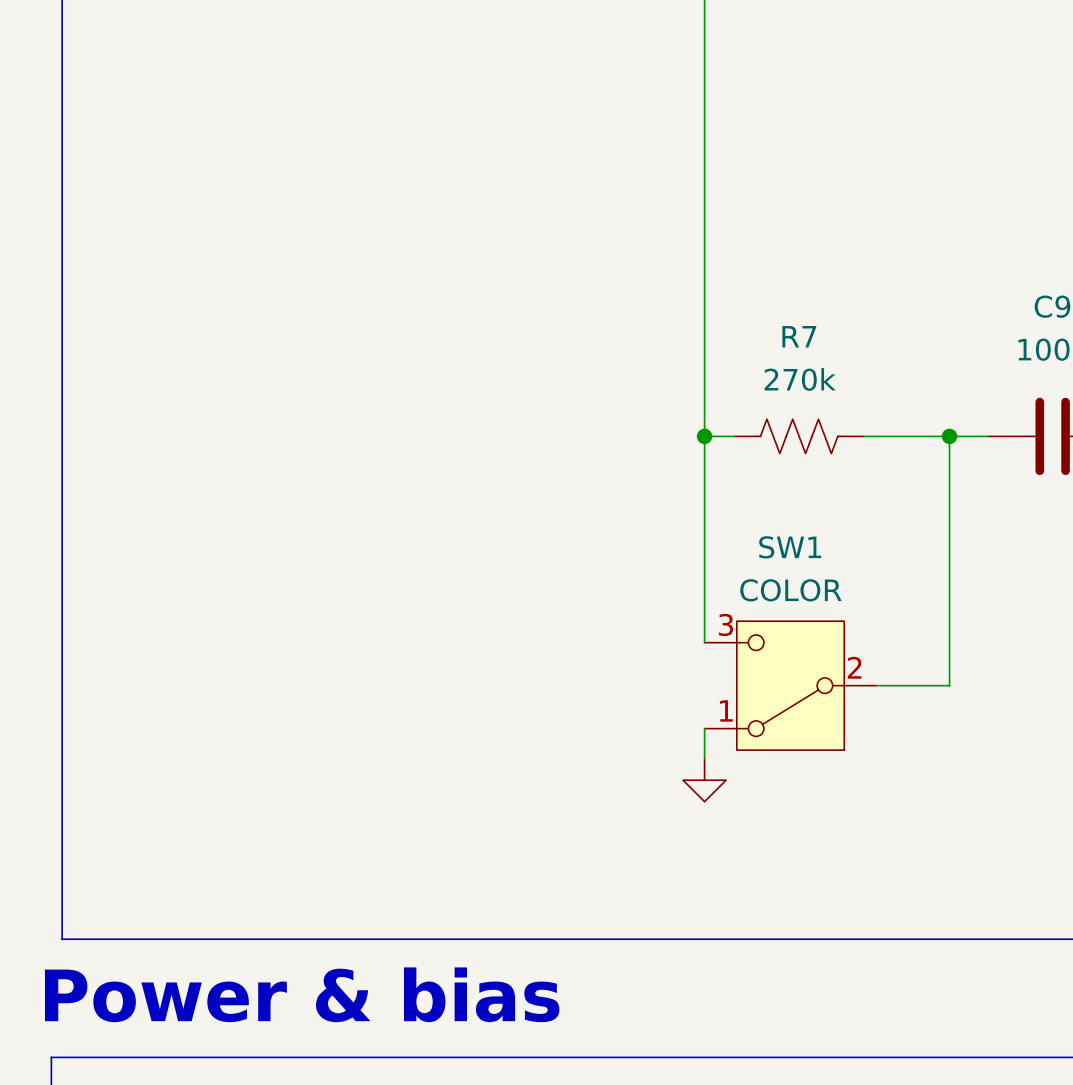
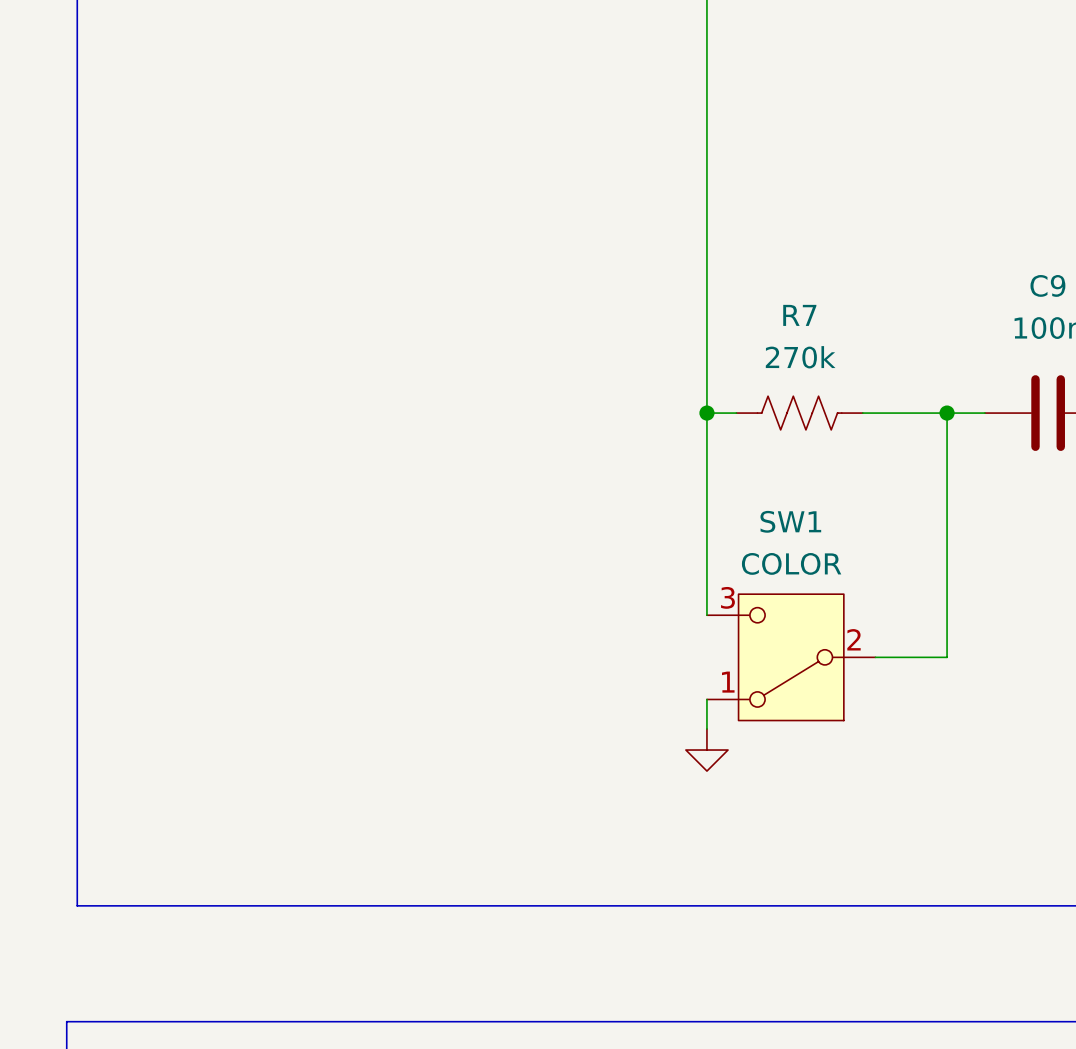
text: Power & bias (302, 994) -> none

